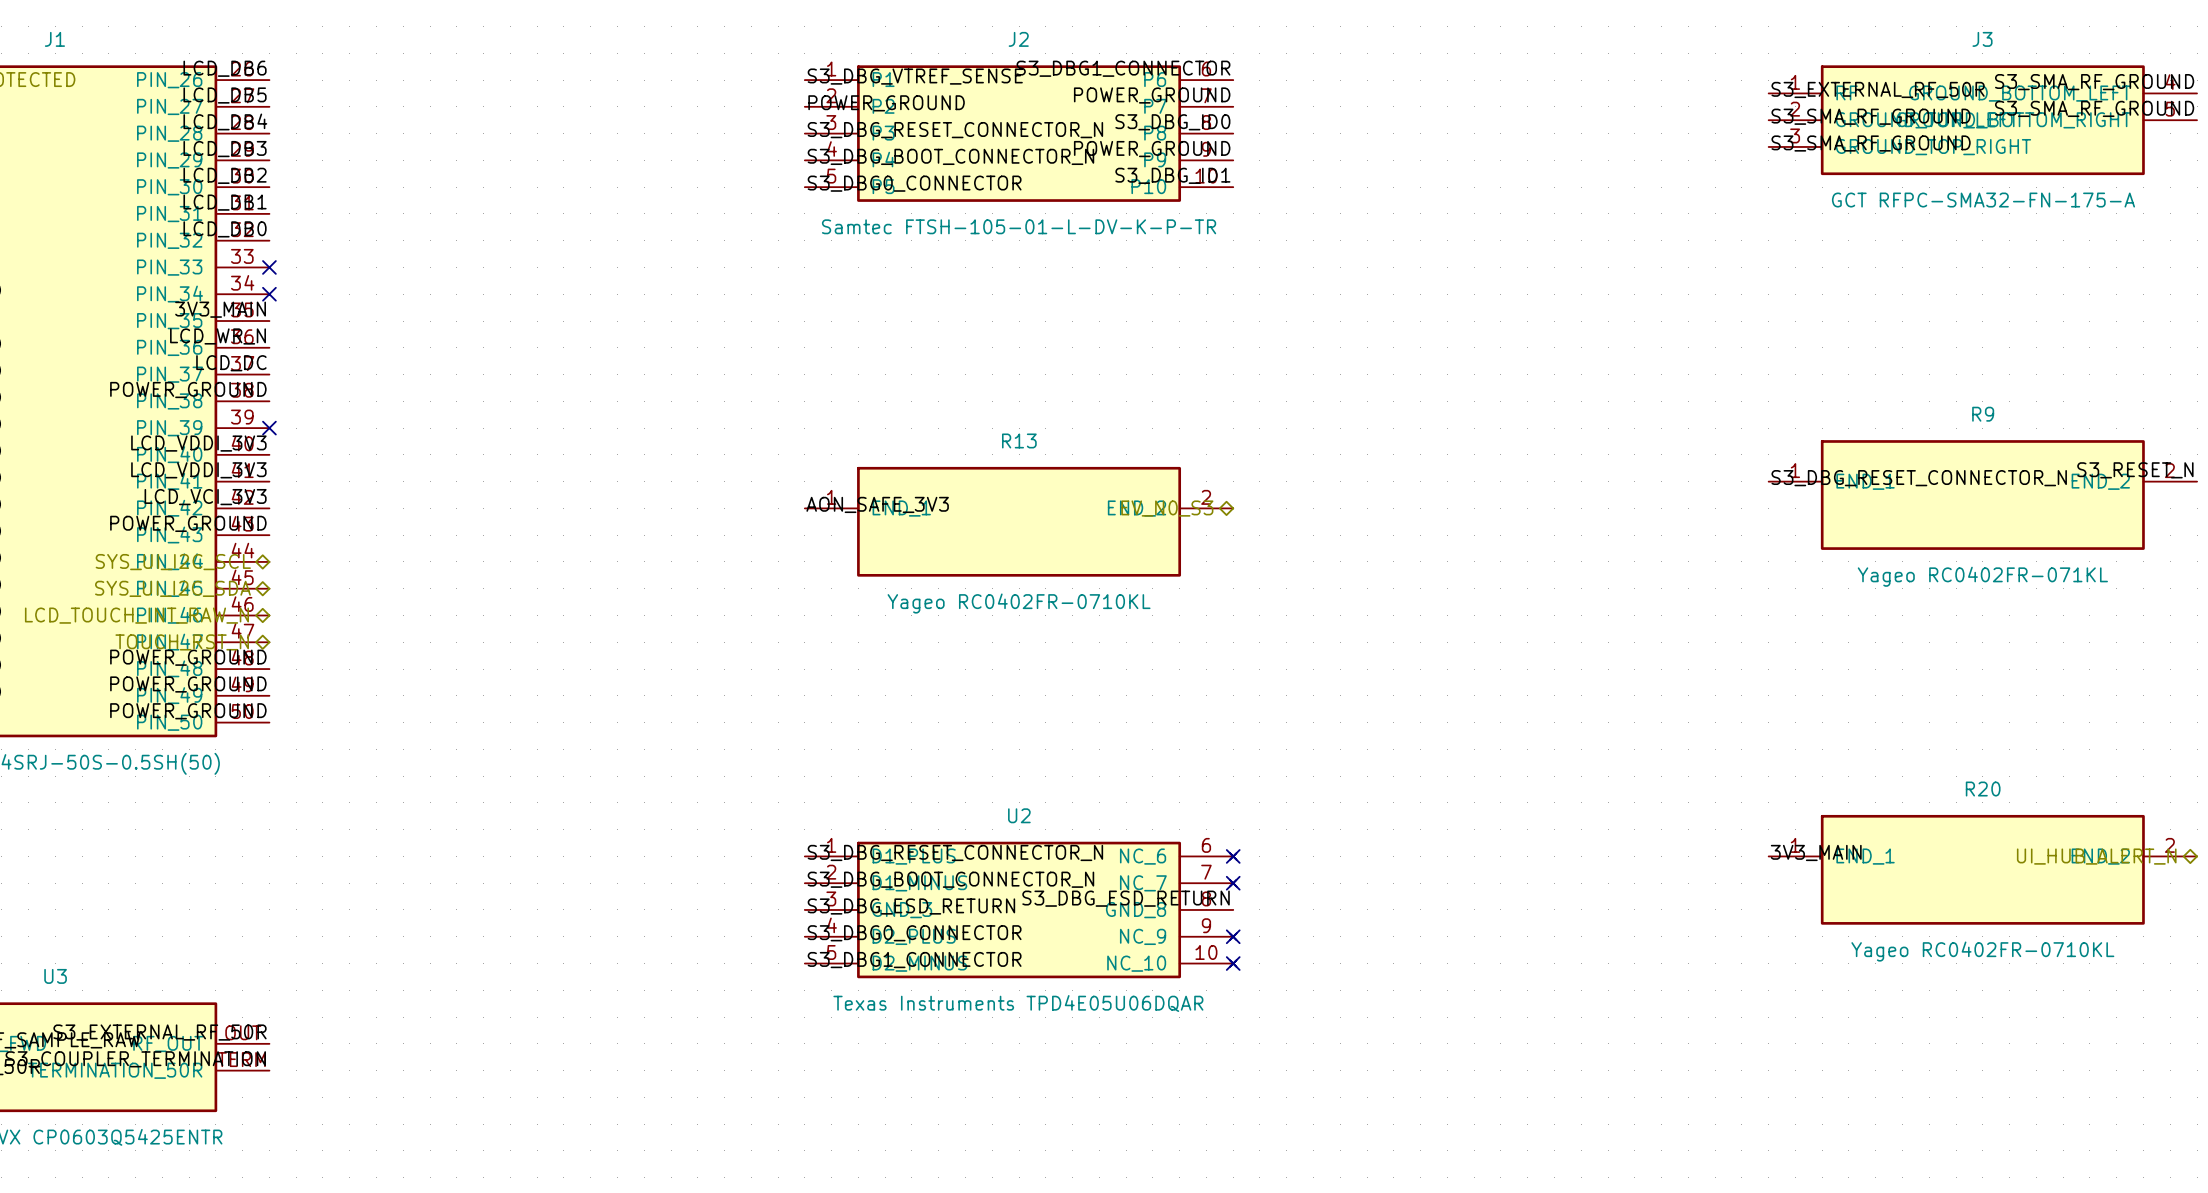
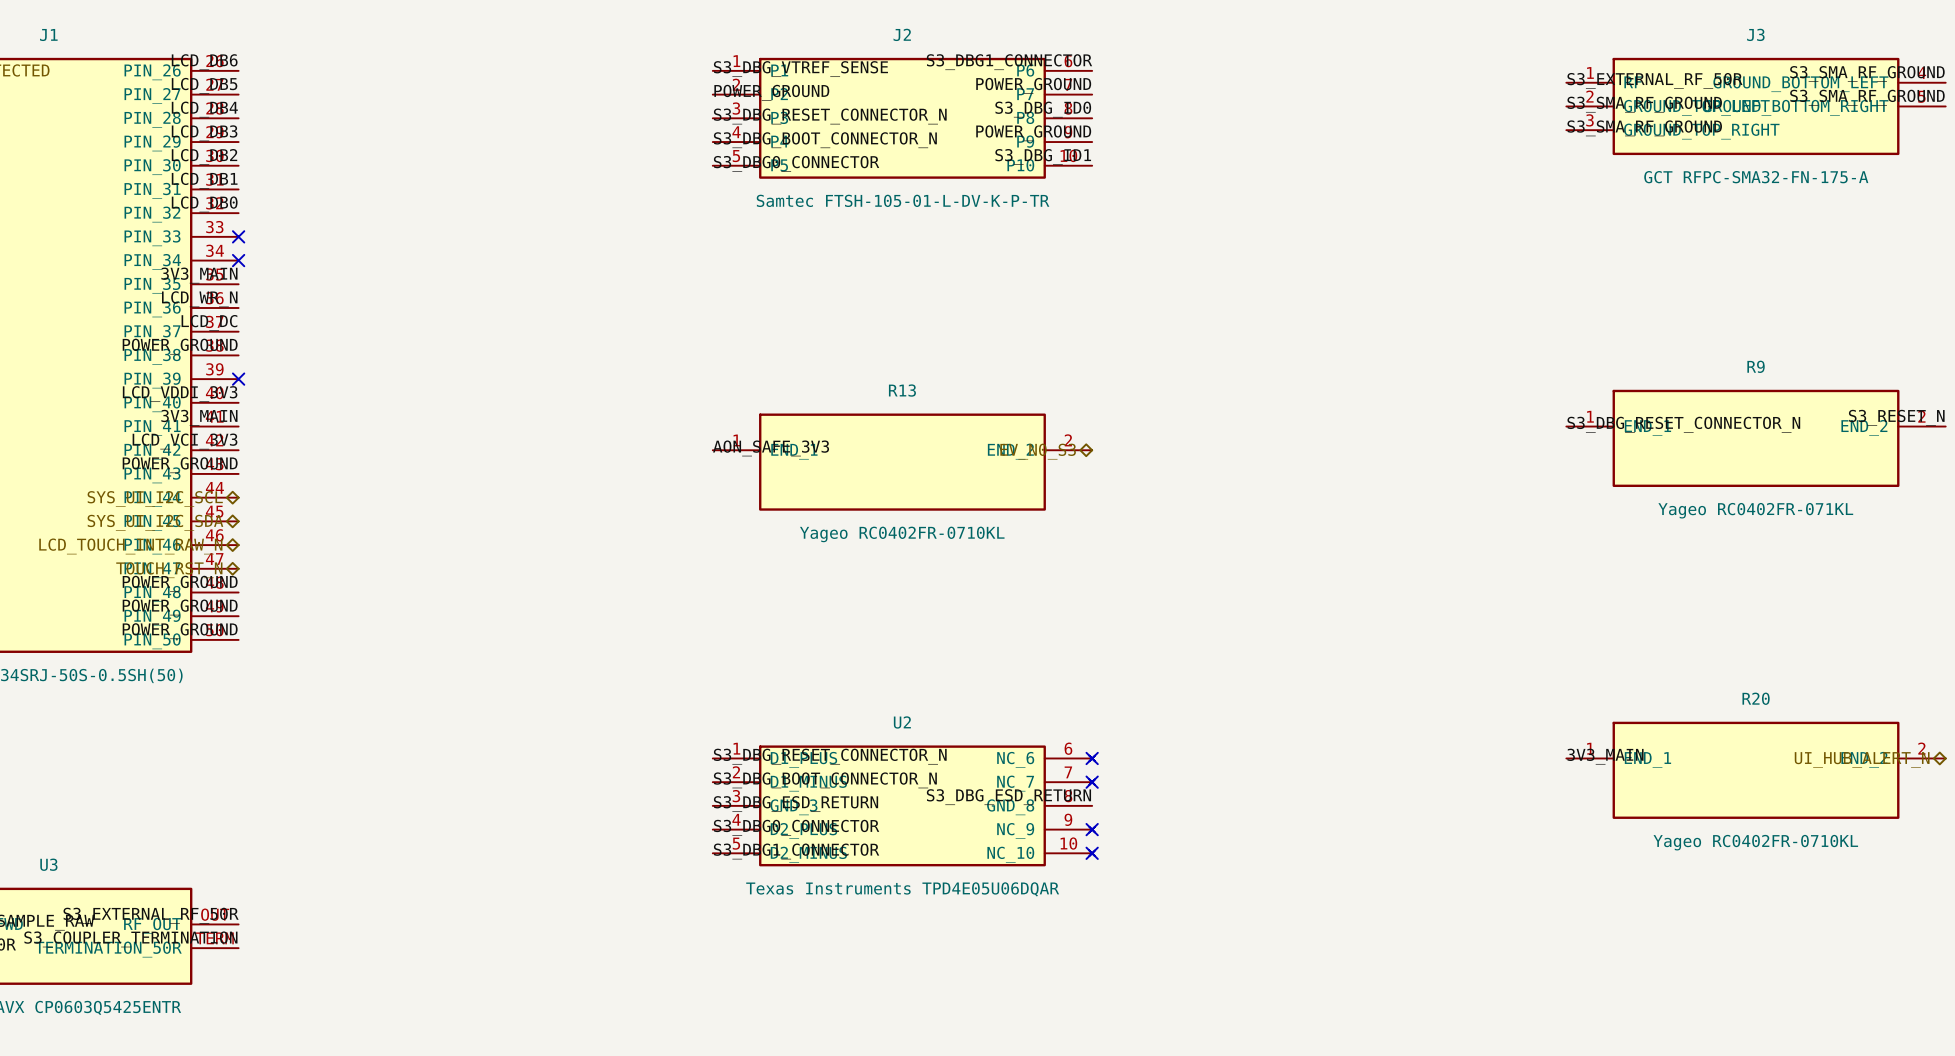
label: LCD_VDDI_3V3 (198, 470) -> 3V3_MAIN (199, 417)

